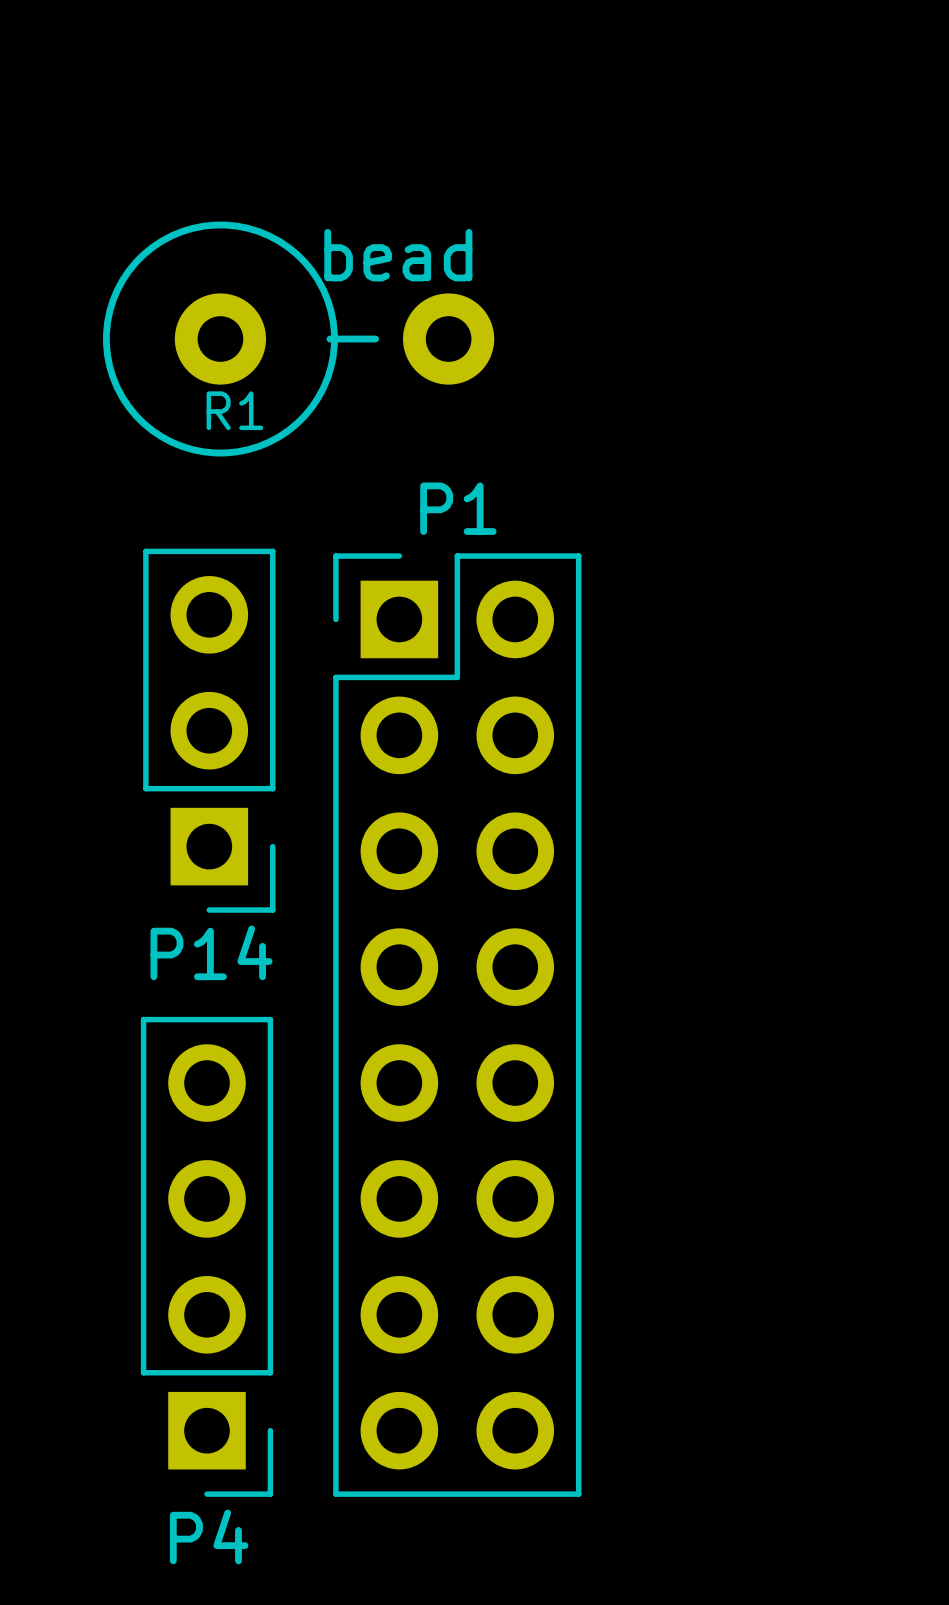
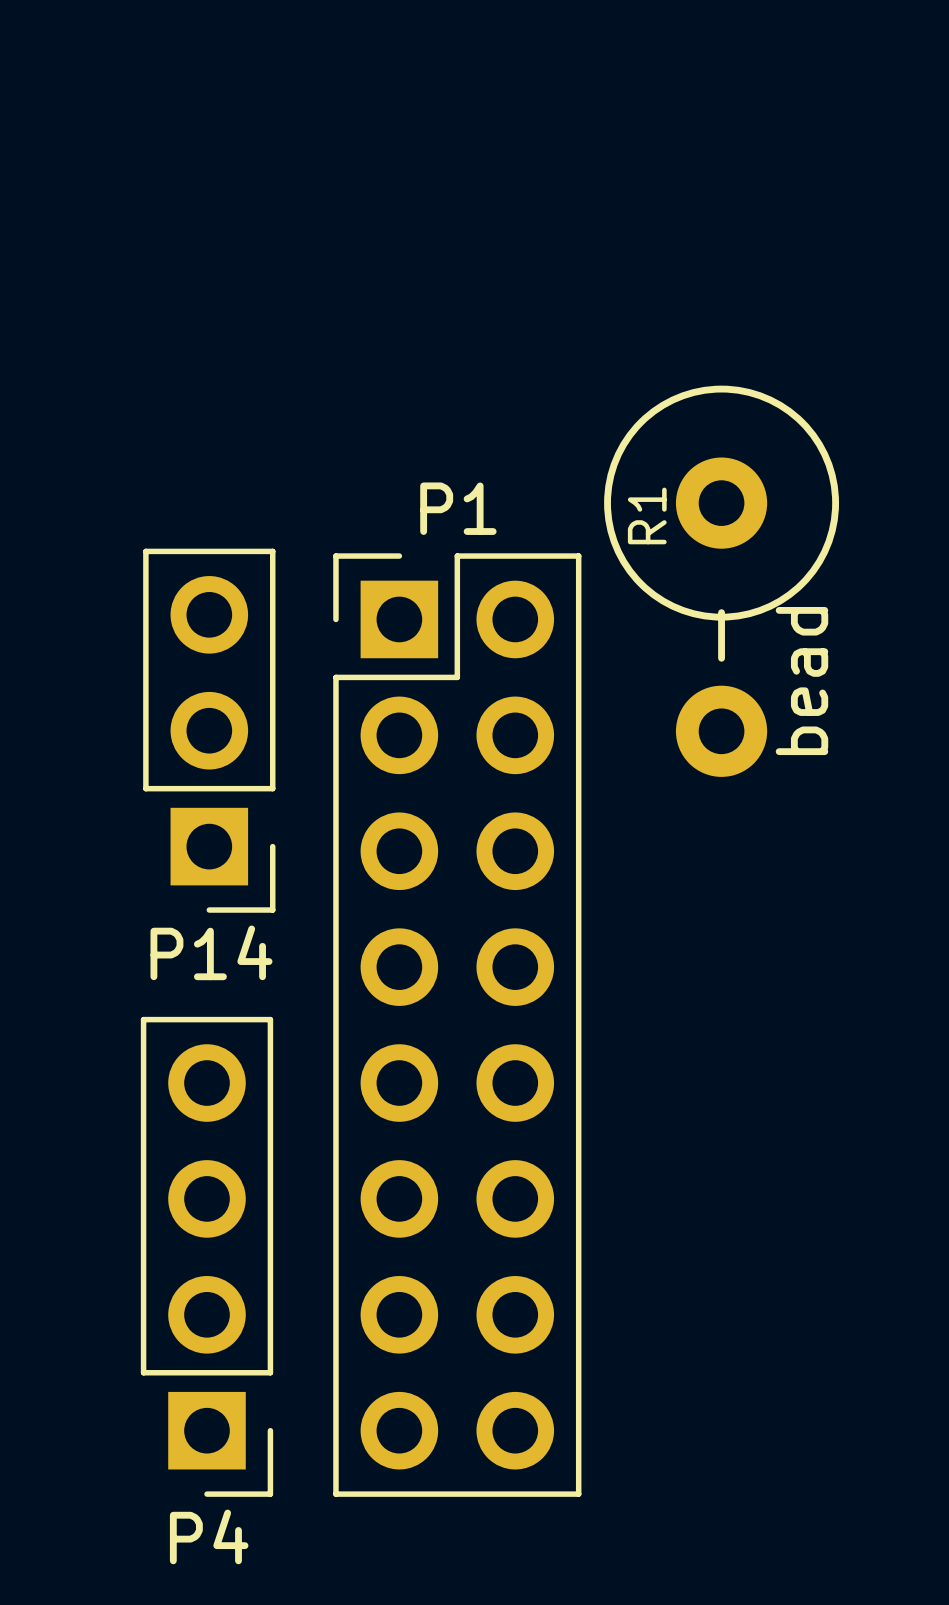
R1 rotation: 0° (298, 339) -> 90° clockwise (721, 581)
R1 position: (298, 339) -> (721, 581)

